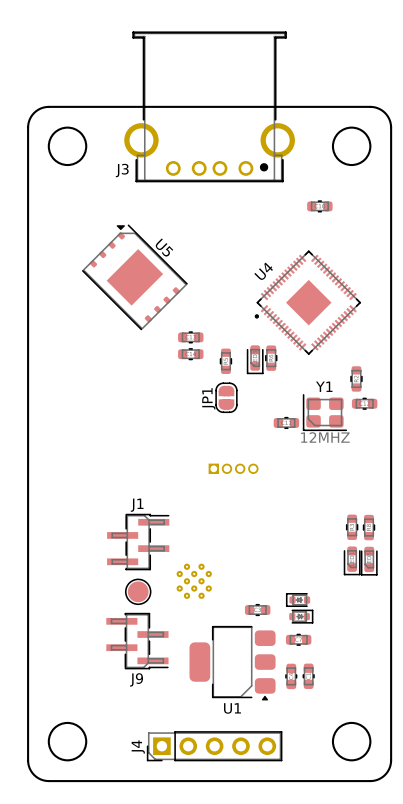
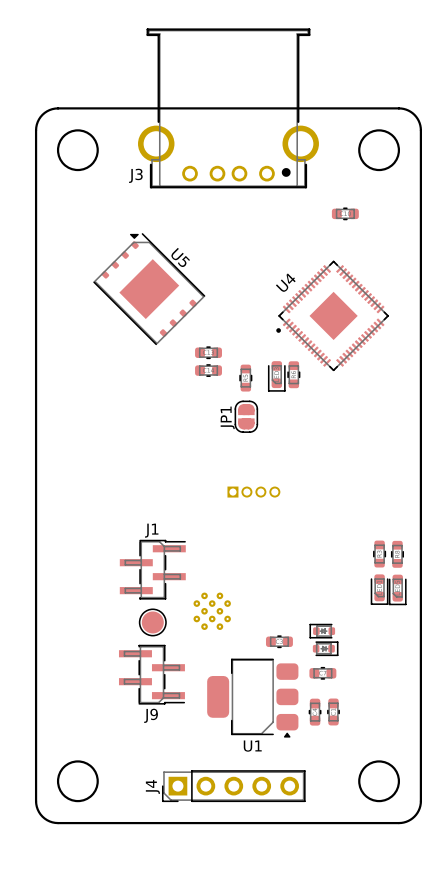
part: (356, 378) -> none
part: (364, 403) -> none
Y1: 12MHZ (324, 412) -> none
part: (286, 422) -> none

